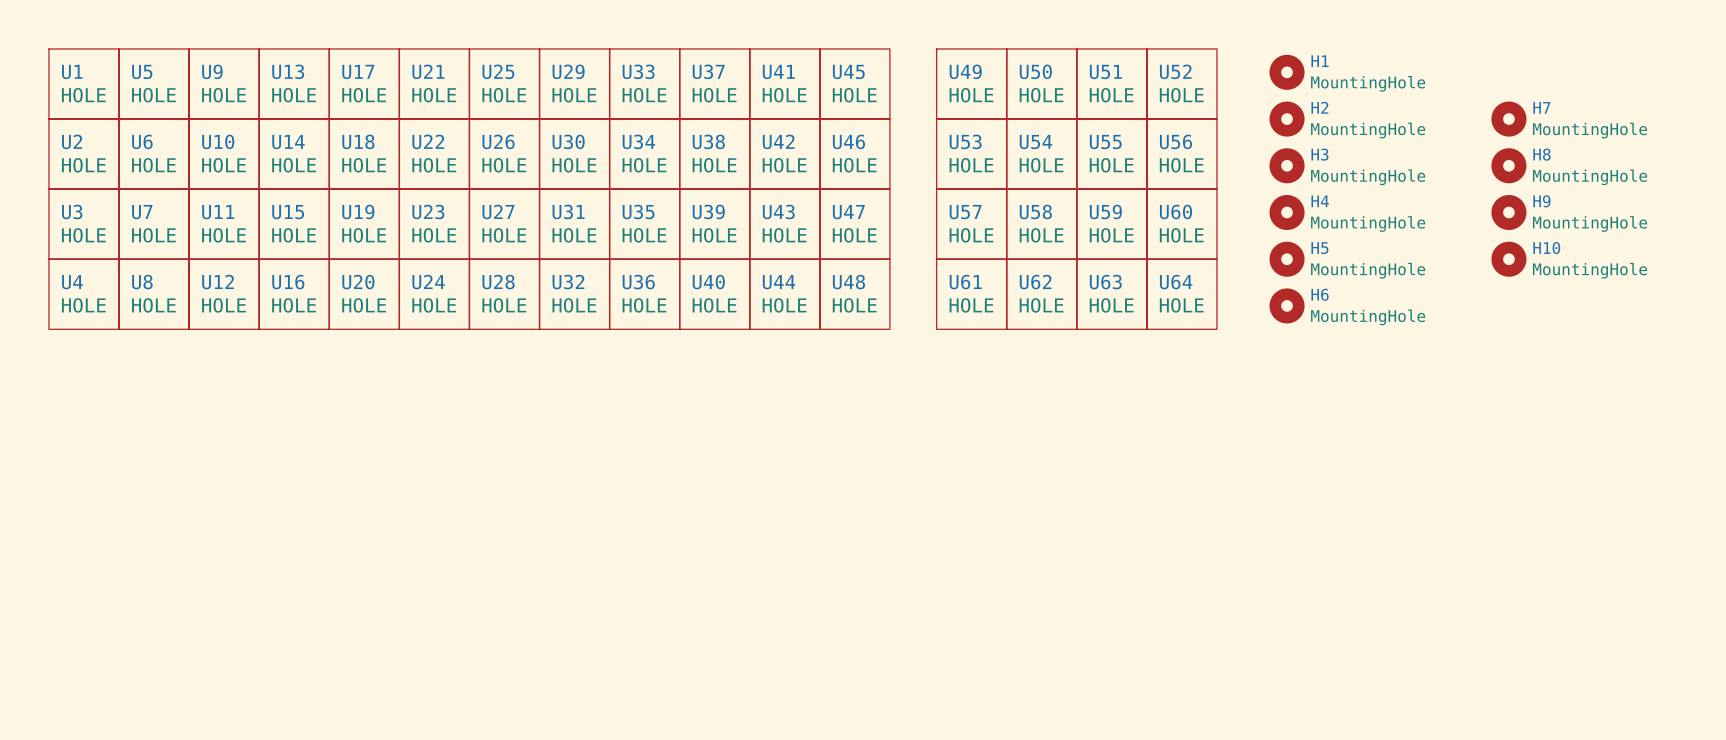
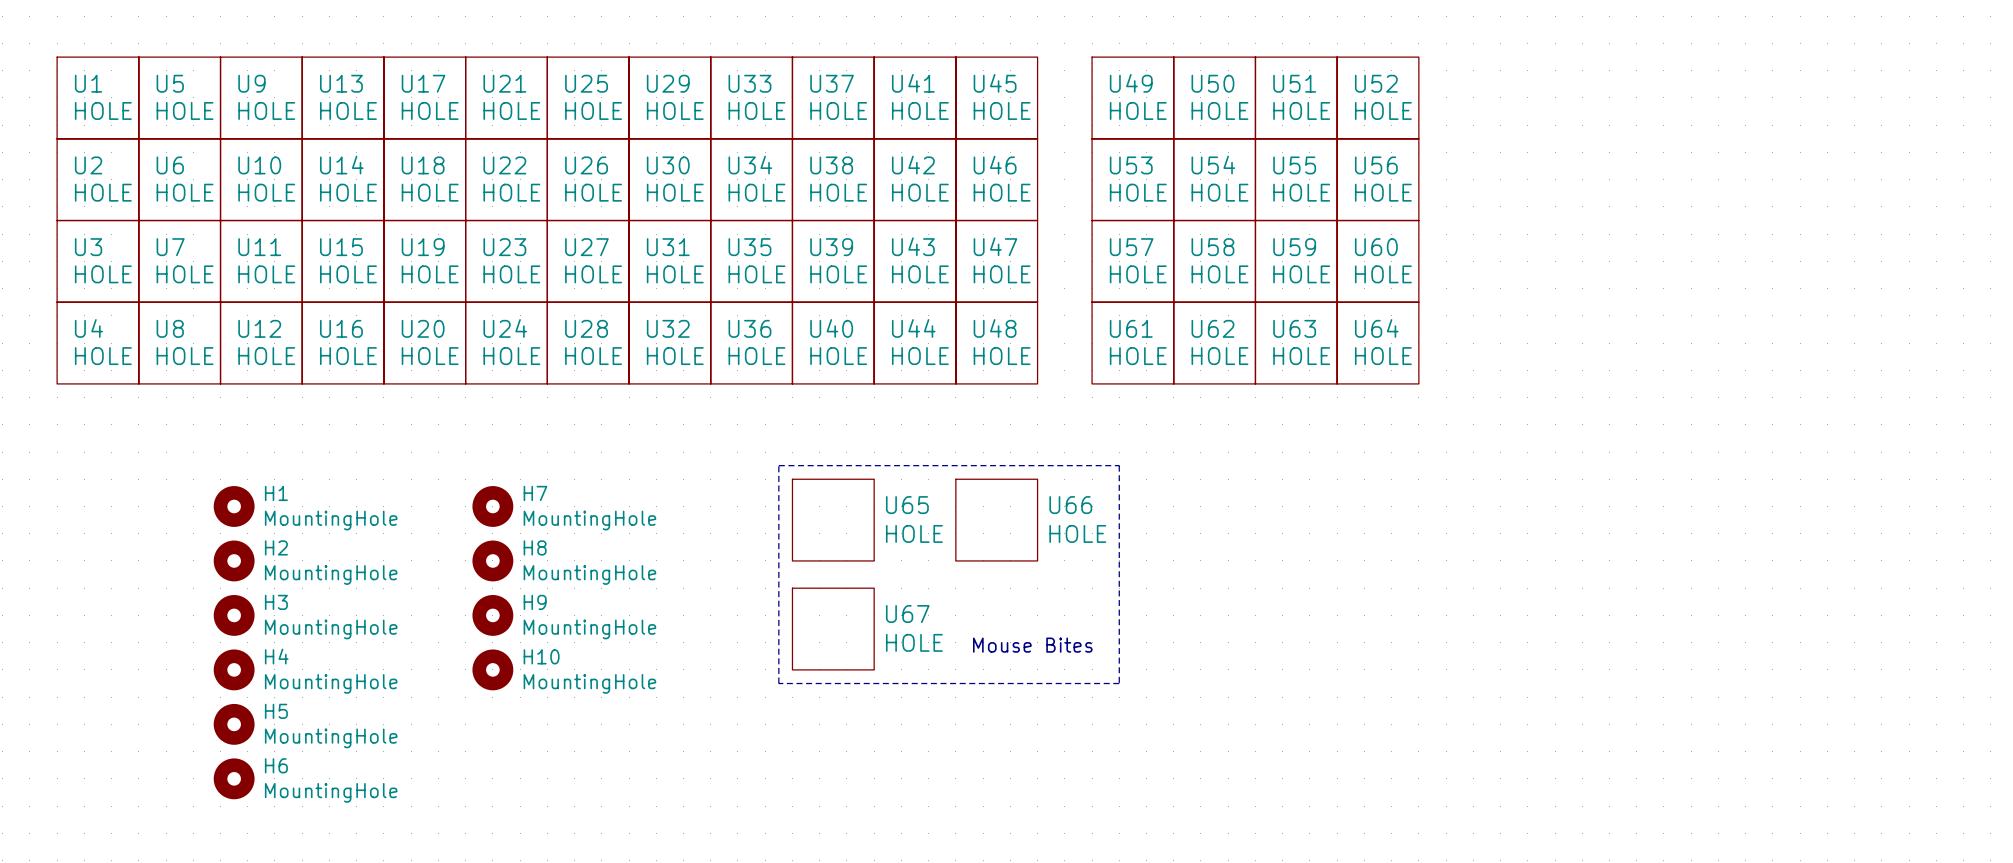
H1 position: (1287, 72) -> (234, 506)
H2 position: (1287, 119) -> (234, 560)
H7 position: (1508, 119) -> (492, 506)
H3 position: (1287, 165) -> (234, 615)
H8 position: (1508, 165) -> (492, 560)
H4 position: (1287, 212) -> (234, 669)
H9 position: (1508, 212) -> (492, 615)
H5 position: (1287, 259) -> (234, 724)
H10 position: (1508, 259) -> (492, 669)
H6 position: (1287, 305) -> (234, 778)
line: none -> (778, 465) (1119, 465) (1119, 683) (778, 683) (778, 465)
U65: none -> HOLE (833, 520)
U66: none -> HOLE (996, 520)
U67: none -> HOLE (833, 629)
text: none -> Mouse Bites (1032, 645)

